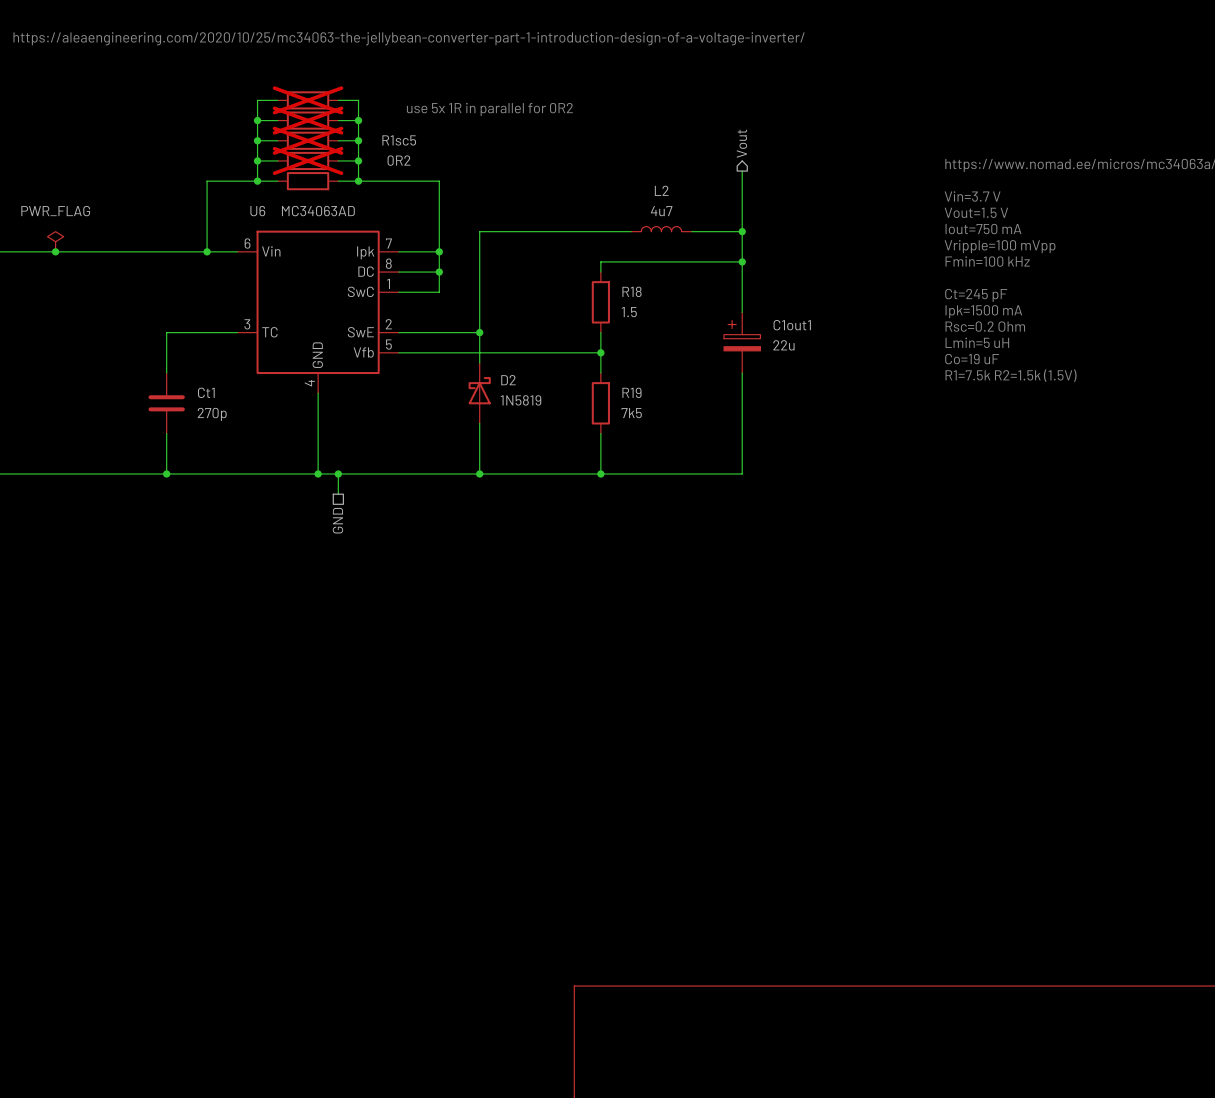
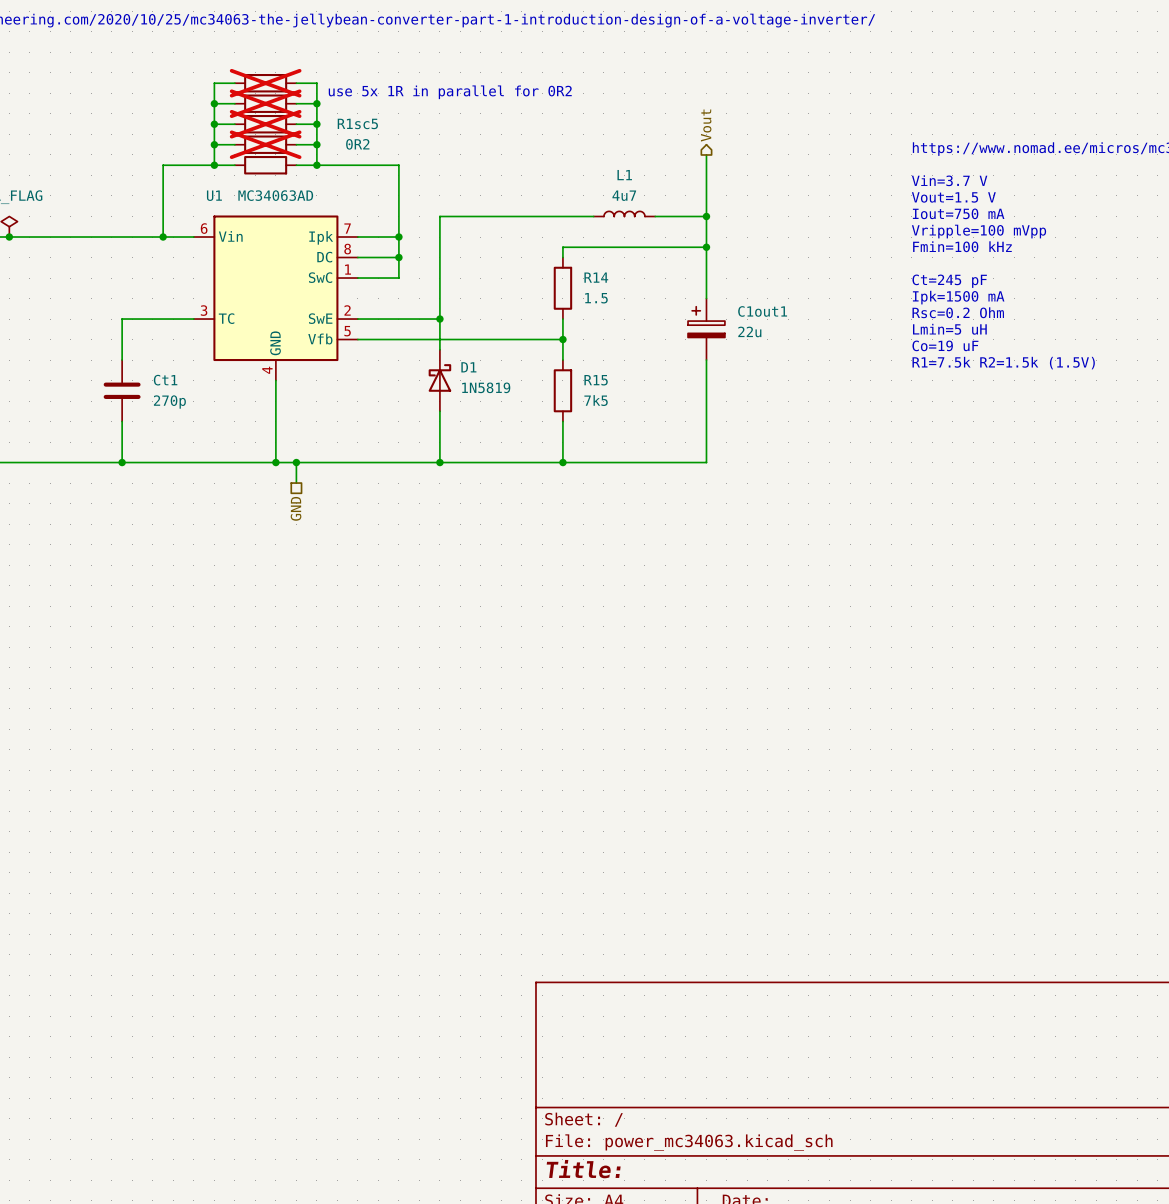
L2 name: L2 (661, 190) -> L1 (624, 175)
U6 name: U6 (257, 211) -> U1 (214, 195)
R18 name: R18 (632, 291) -> R14 (596, 277)
D2 name: D2 (508, 380) -> D1 (468, 367)
R19 name: R19 (631, 392) -> R15 (596, 380)

